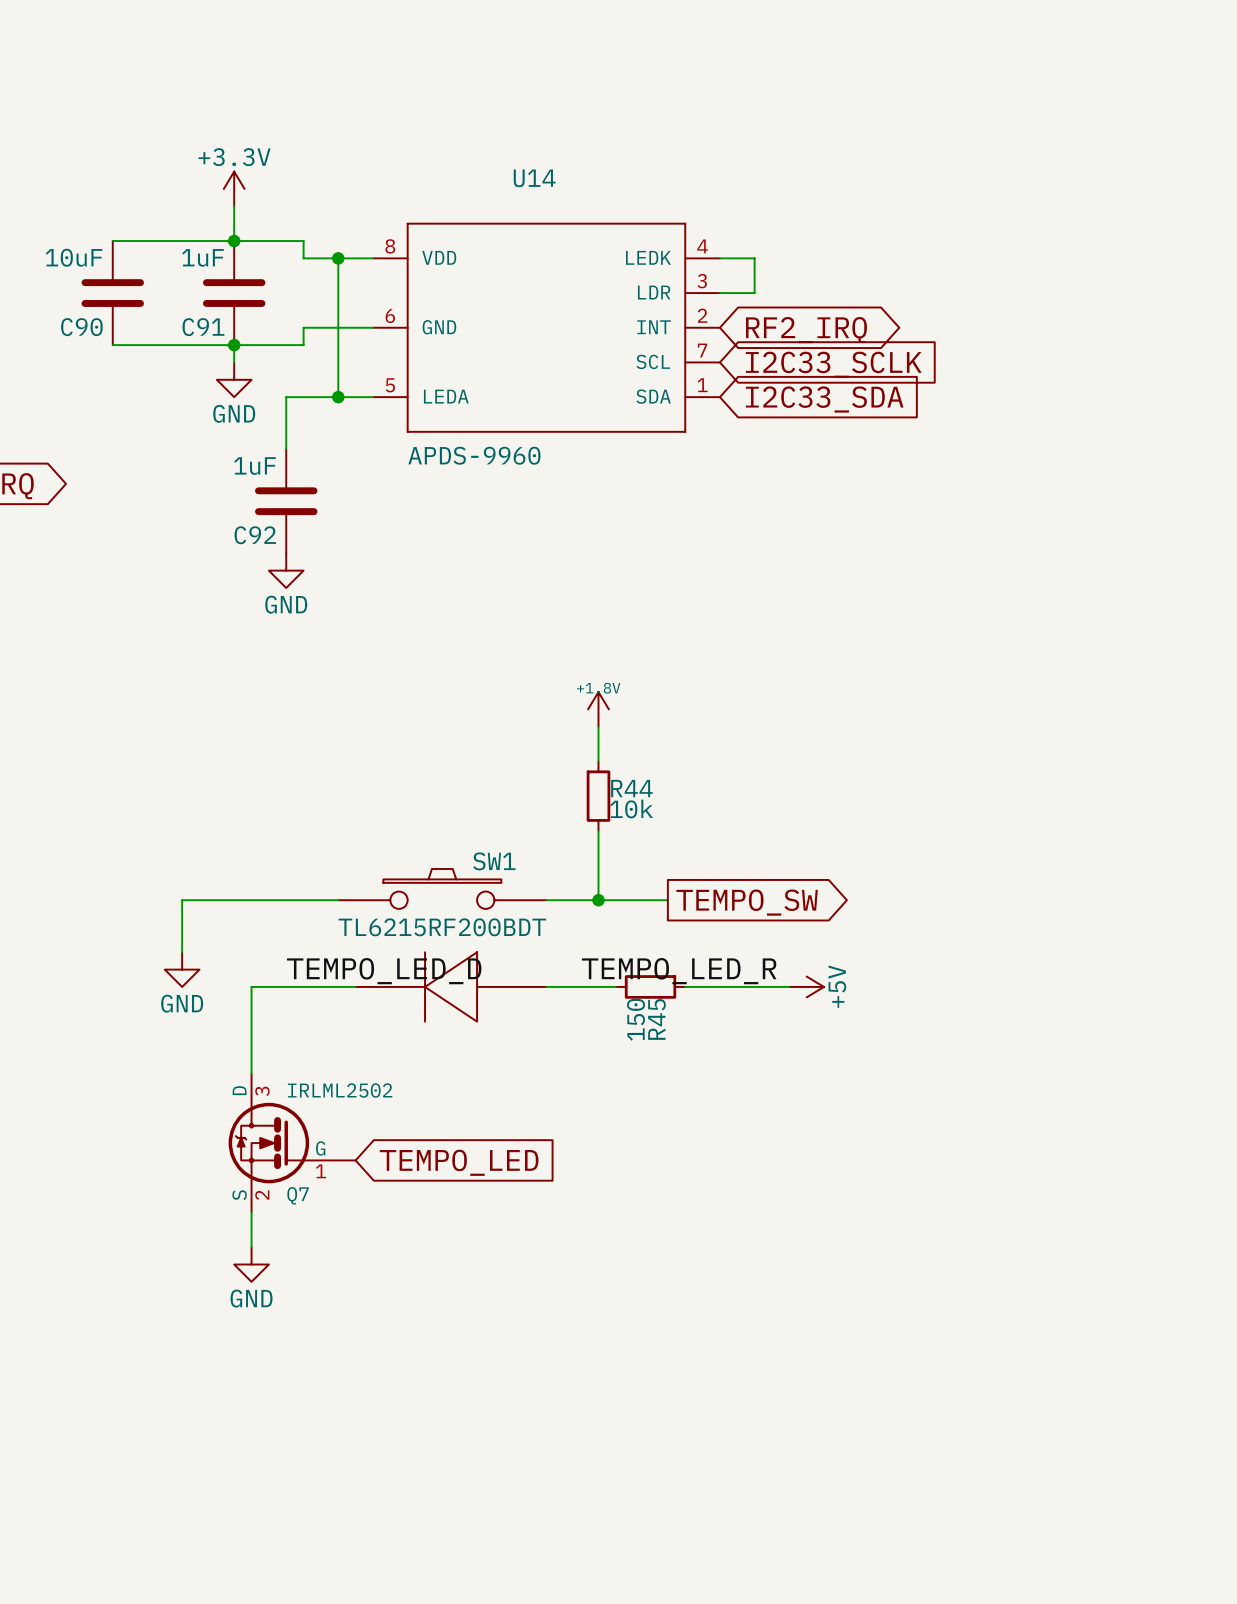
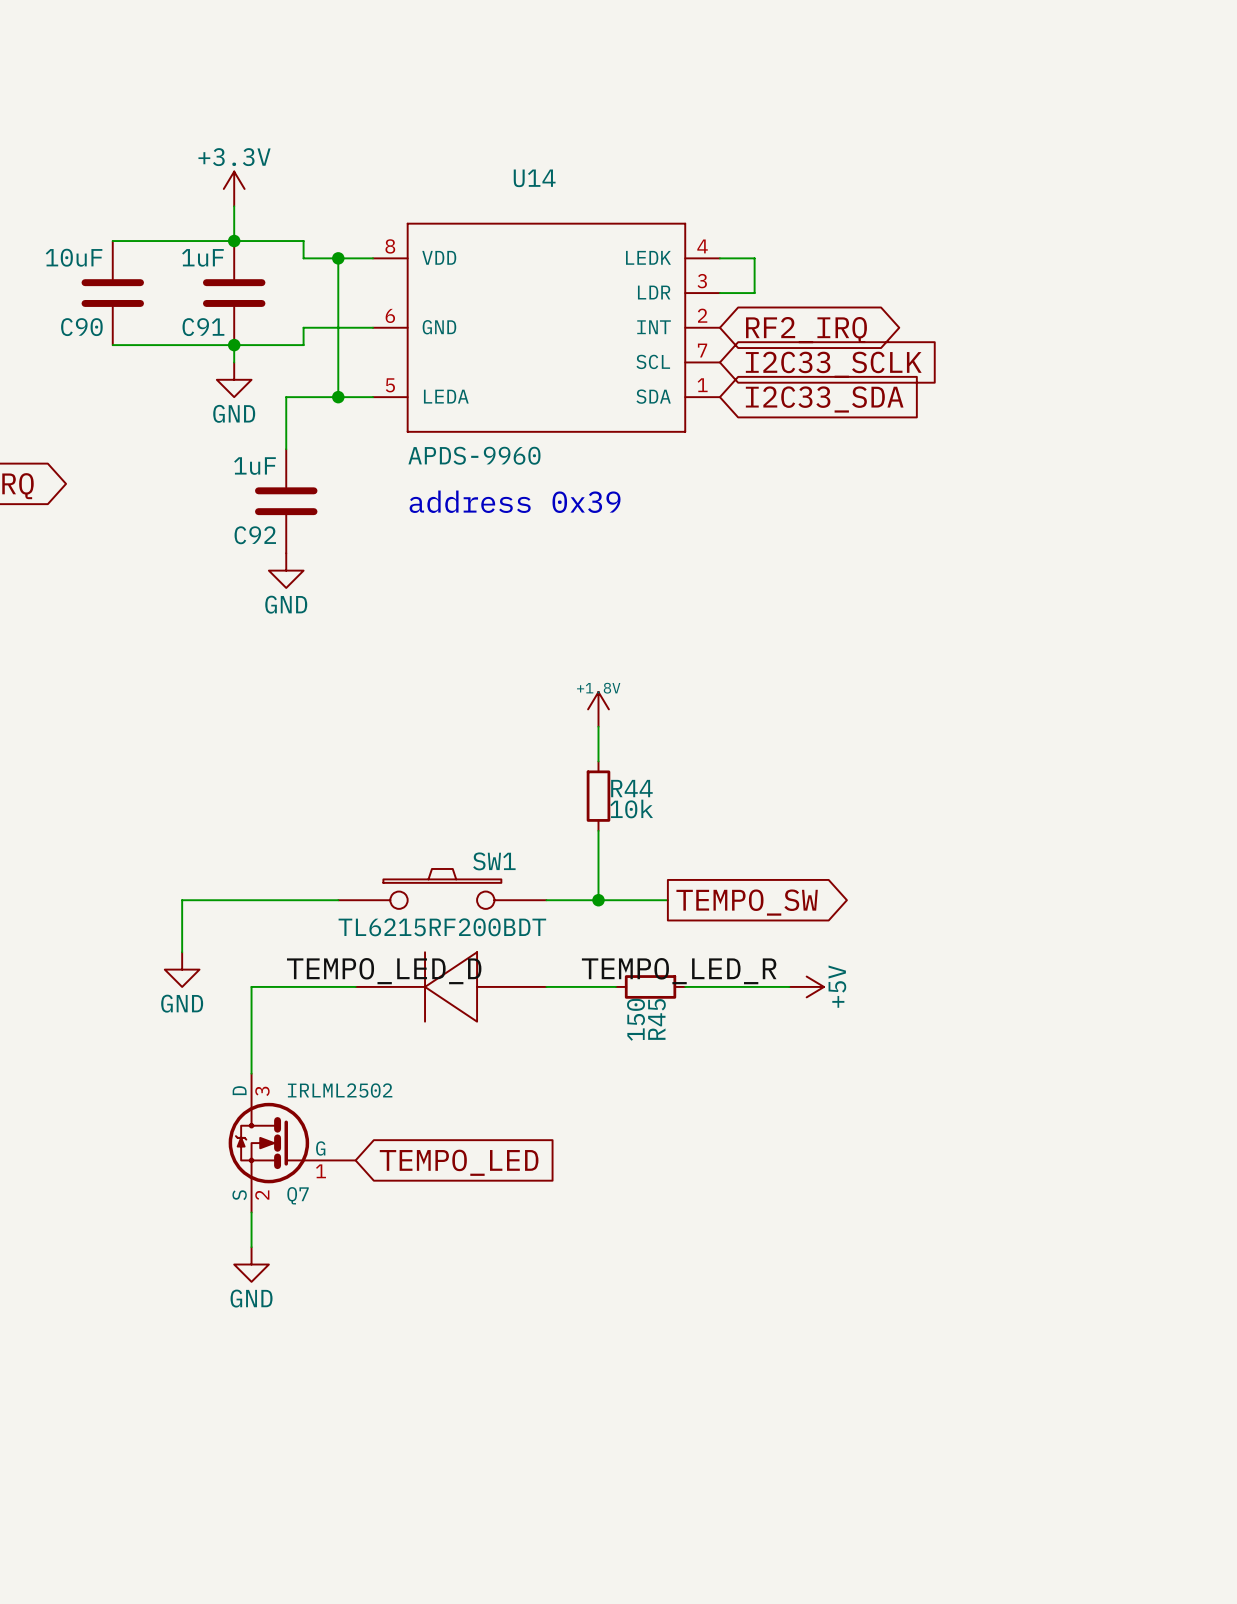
text: none -> address 0x39 (515, 501)

